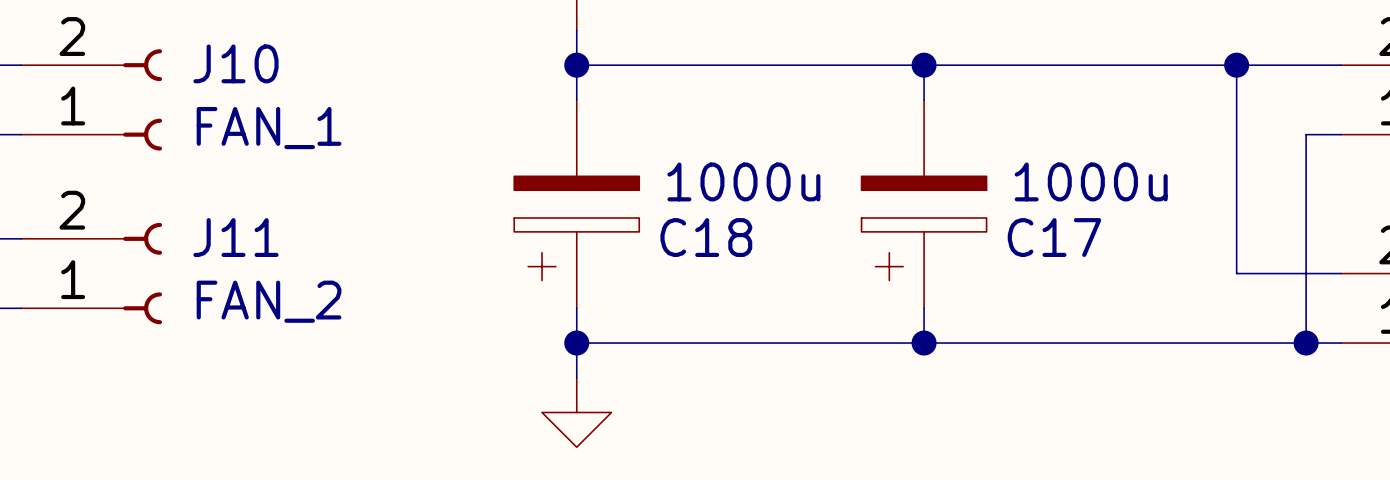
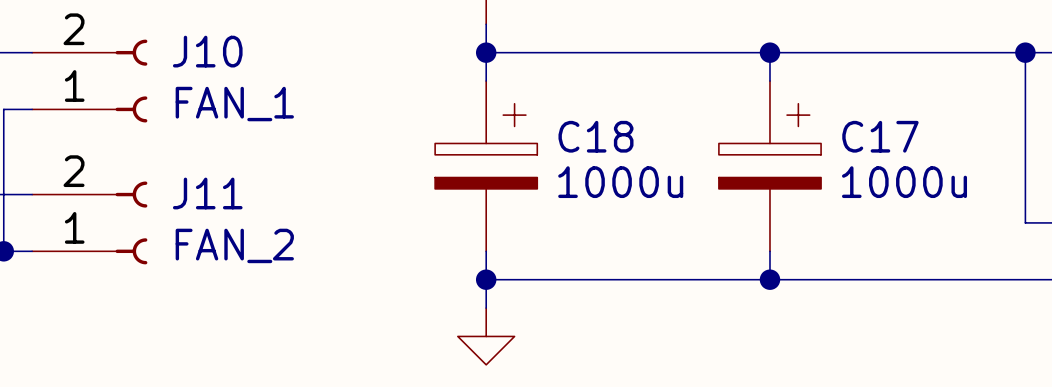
C18 rotation: 0° (576, 228) -> 180° (486, 146)
C17 rotation: 0° (924, 228) -> 180° (769, 146)
C18 name position: C18 (706, 237) -> C18 (595, 136)
C17 name position: C17 (1054, 237) -> C17 (880, 136)

